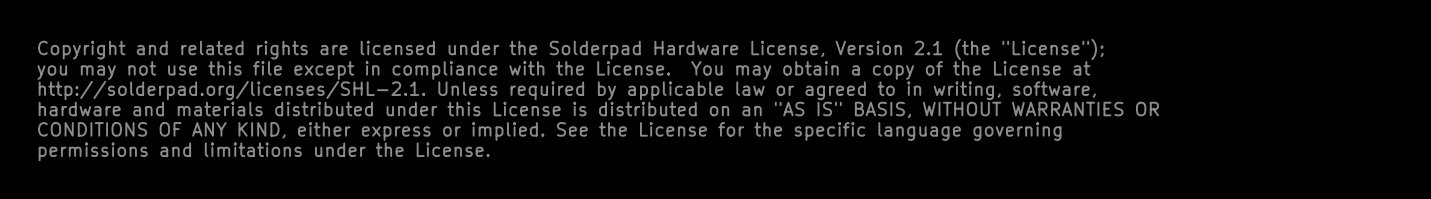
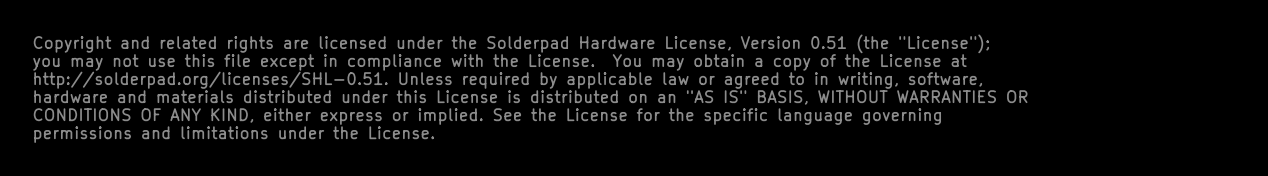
text: Copyright and related rights are licensed under the Solderpad Hardware License, Version 2.1 (the "License"); (570, 49) -> Copyright and related rights are licensed under the Solderpad Hardware License, Version 0.51 (the "License"); (511, 43)
text: http://solderpad.org/licenses/SHL-2.1. Unless required by applicable law or agreed to in writing, software, (567, 90) -> http://solderpad.org/licenses/SHL-0.51. Unless required by applicable law or agreed to in writing, software, (508, 80)

